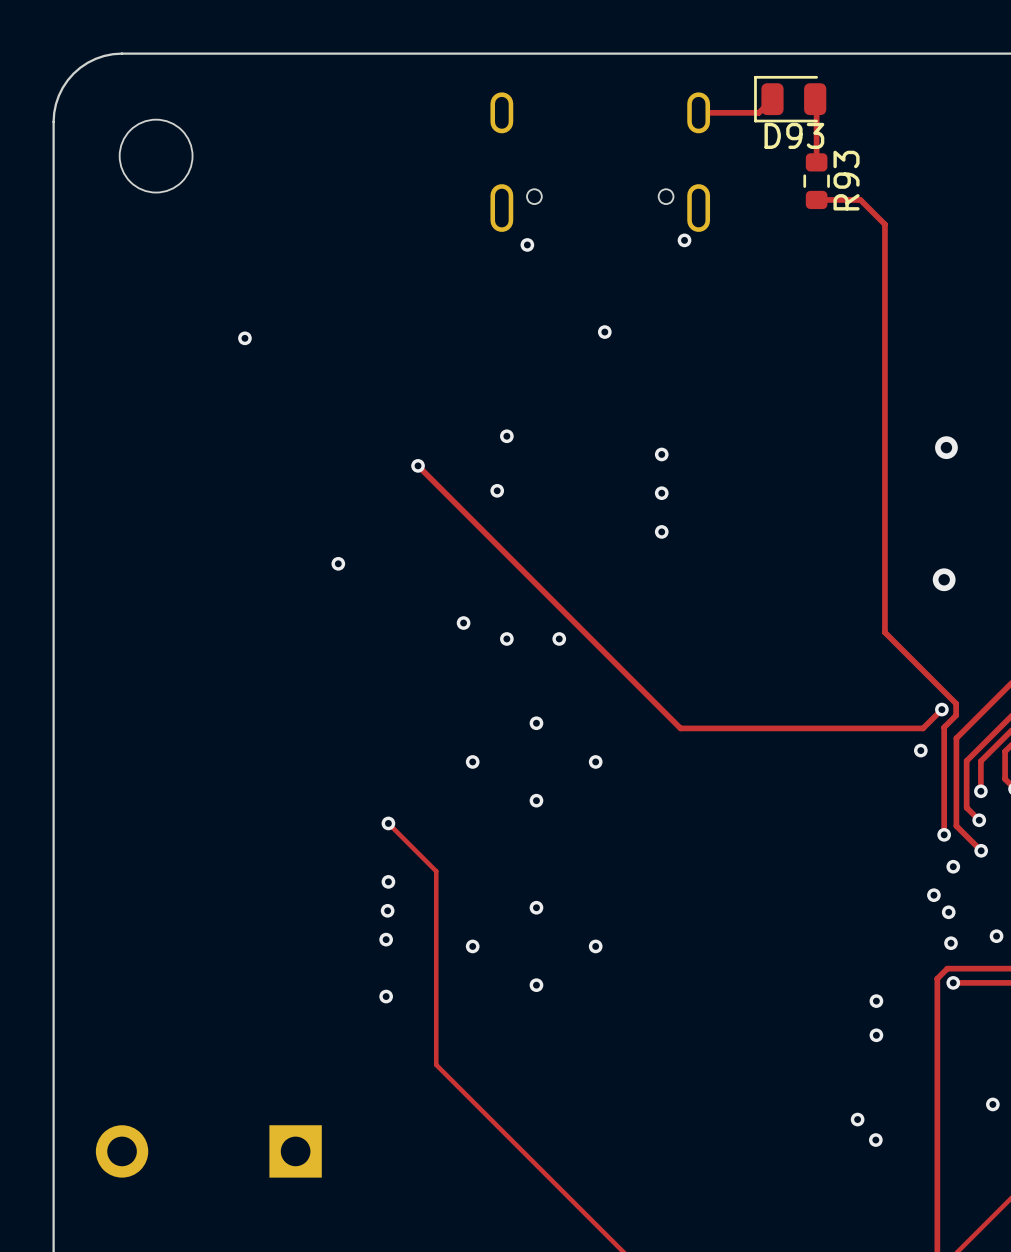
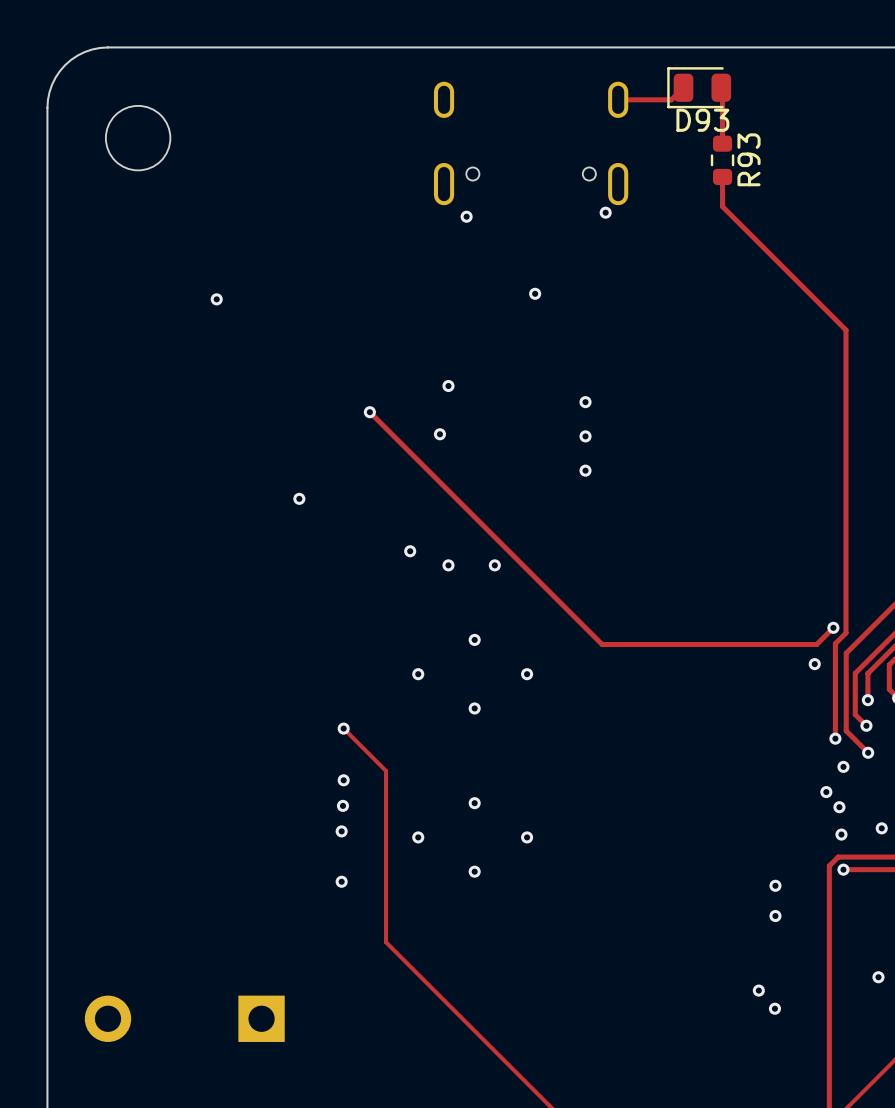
track: (816, 199) (860, 199) (884, 224) (884, 632) (956, 703) -> (722, 176) (722, 206) (845, 330) (845, 622)
via: (946, 447) -> none
via: (944, 579) -> none

